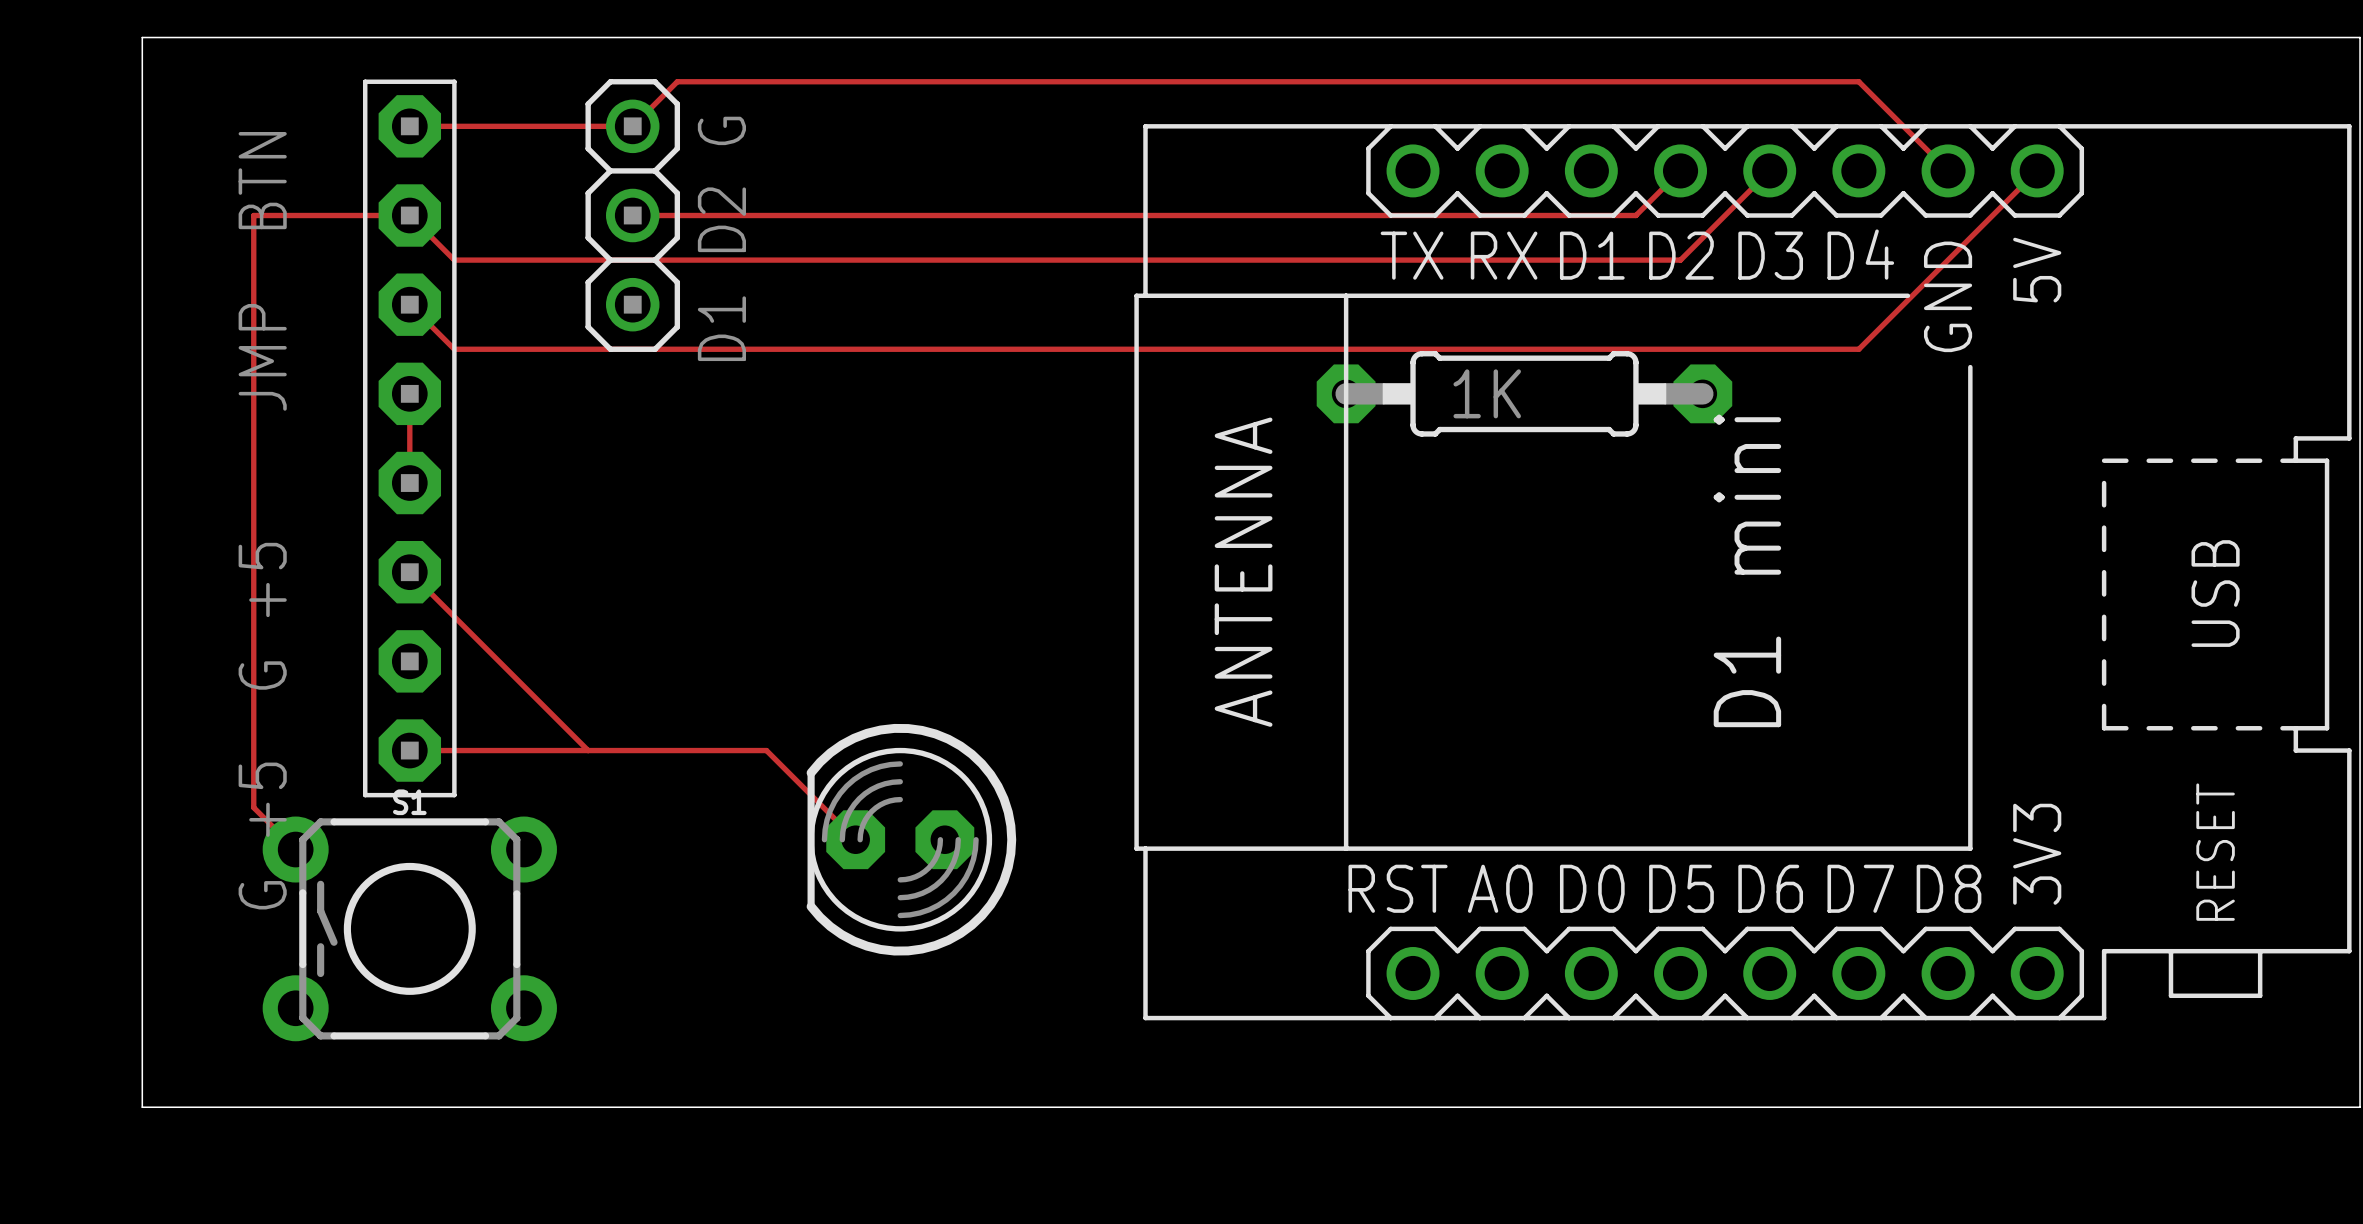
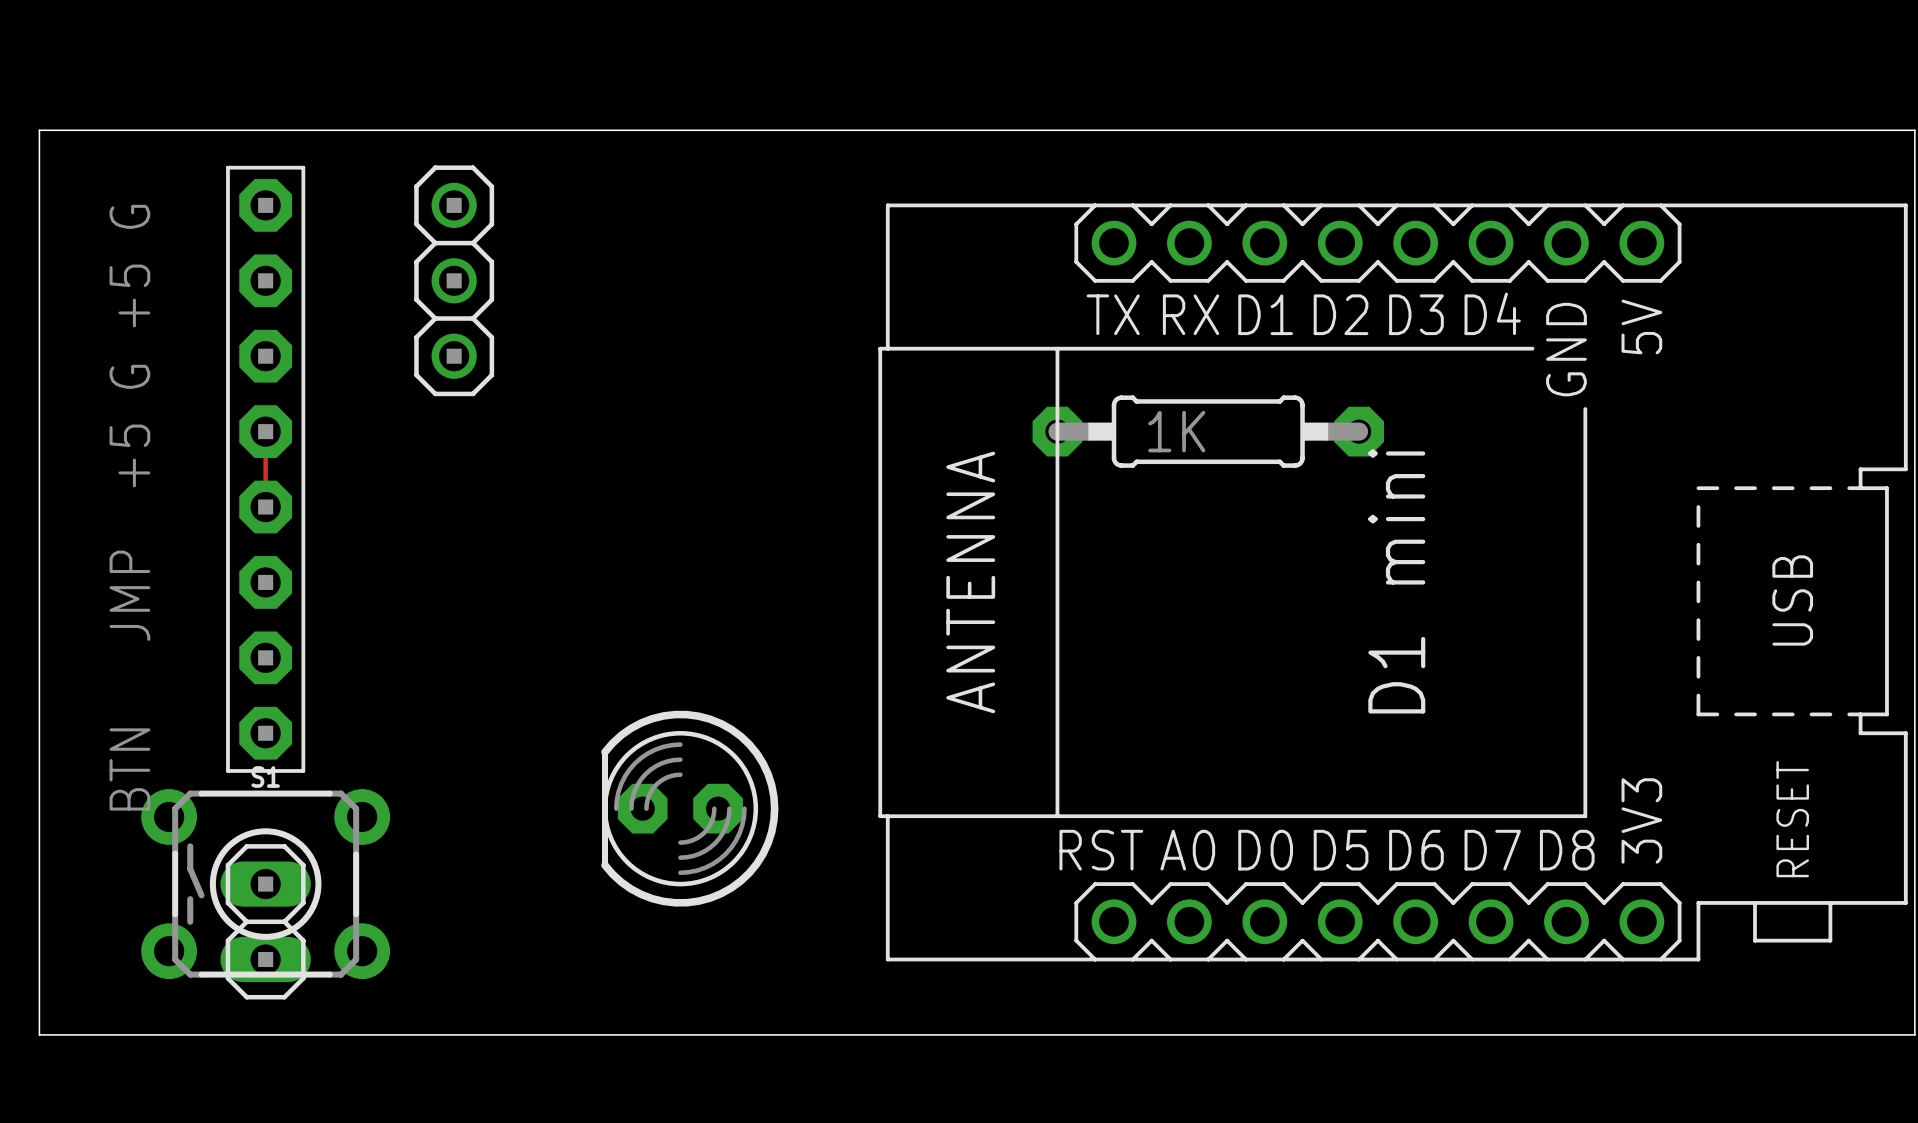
track: (409, 126) (632, 126) (677, 81) (1858, 81) (1948, 170) -> none
track: (1680, 170) (1635, 215) (632, 215) -> none
track: (1769, 170) (1680, 260) (454, 260) (409, 215) (253, 215) (253, 807) (295, 849) -> none
track: (2037, 170) (1858, 349) (454, 349) (409, 304) -> none
text: D1 D2 G (721, 238) -> none
text: G +5 G +5 JMP BTN (262, 520) -> BTN JMP +5 G +5 G (129, 507)
track: (409, 572) (588, 750) -> none
track: (409, 750) (766, 750) (855, 839) -> none
part: none -> (265, 921)

